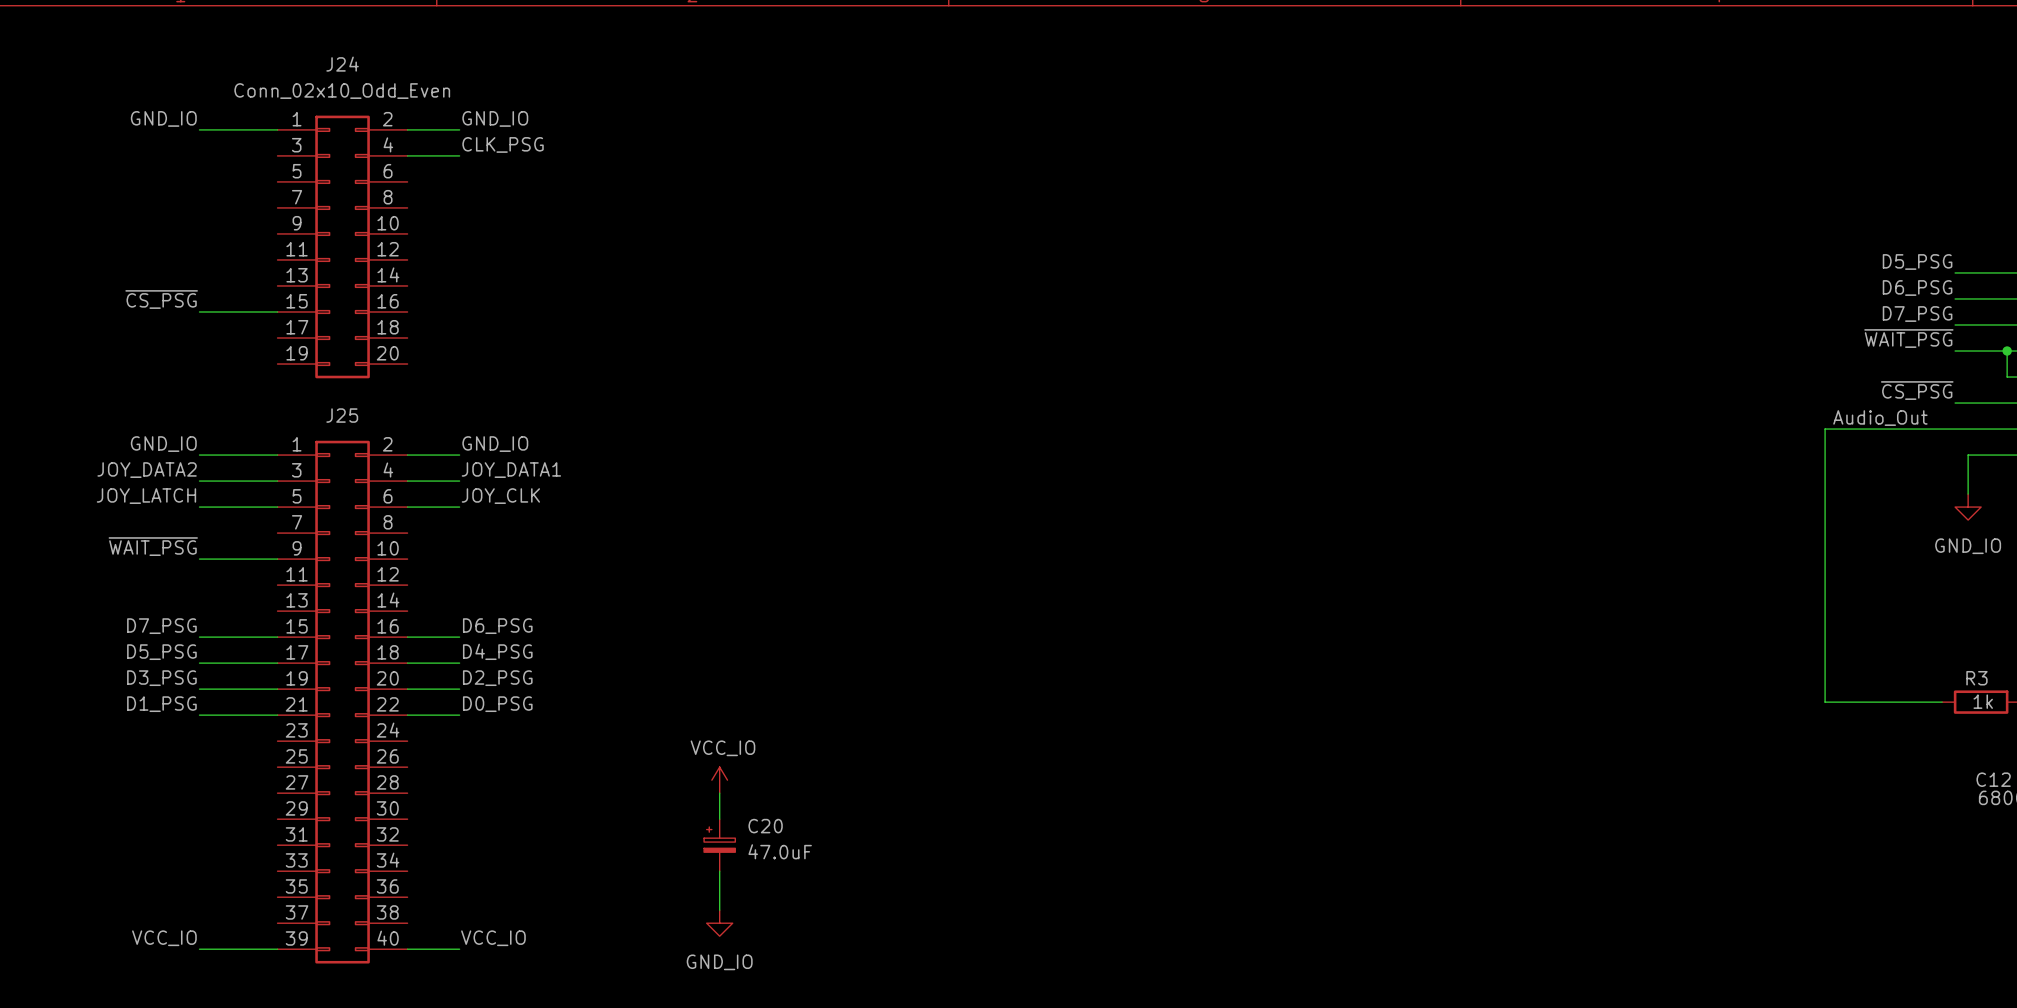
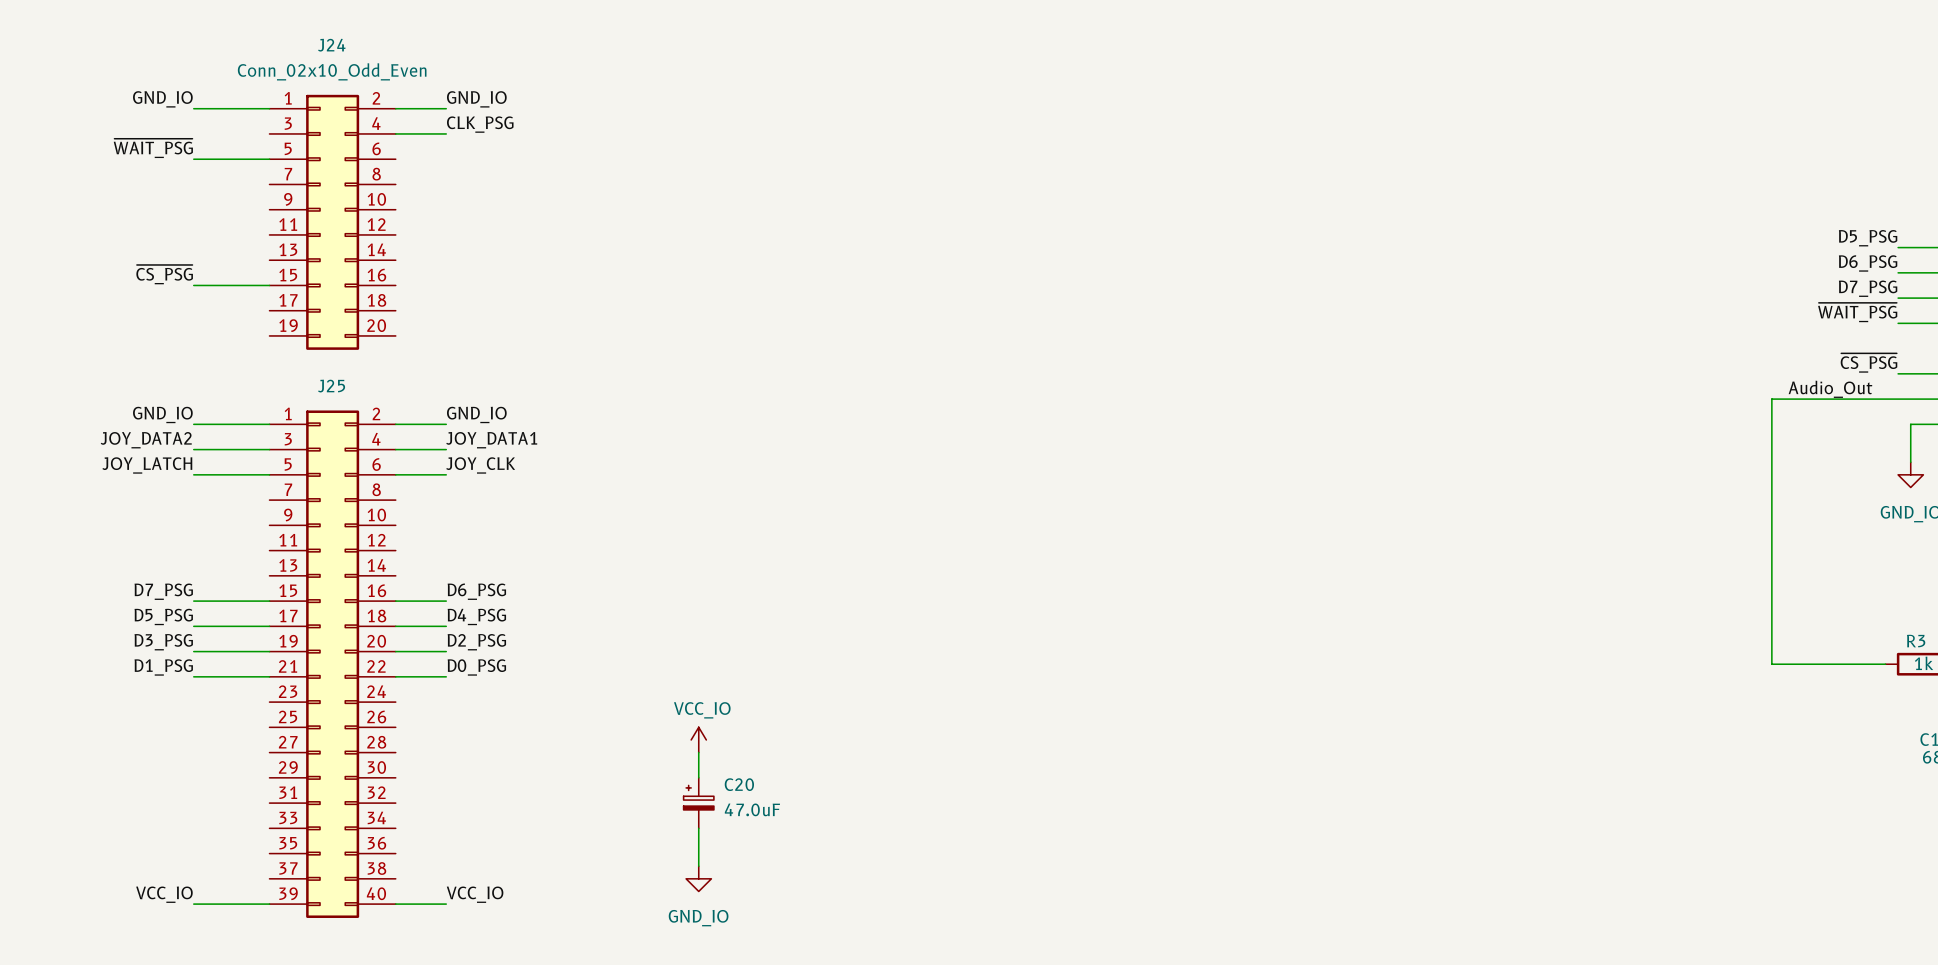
label: none -> ~{WAIT_PSG} (153, 148)
wire: none -> (193, 159) (269, 159)
label: ~{WAIT_PSG} (153, 546) -> none
wire: (199, 559) (277, 559) -> none

